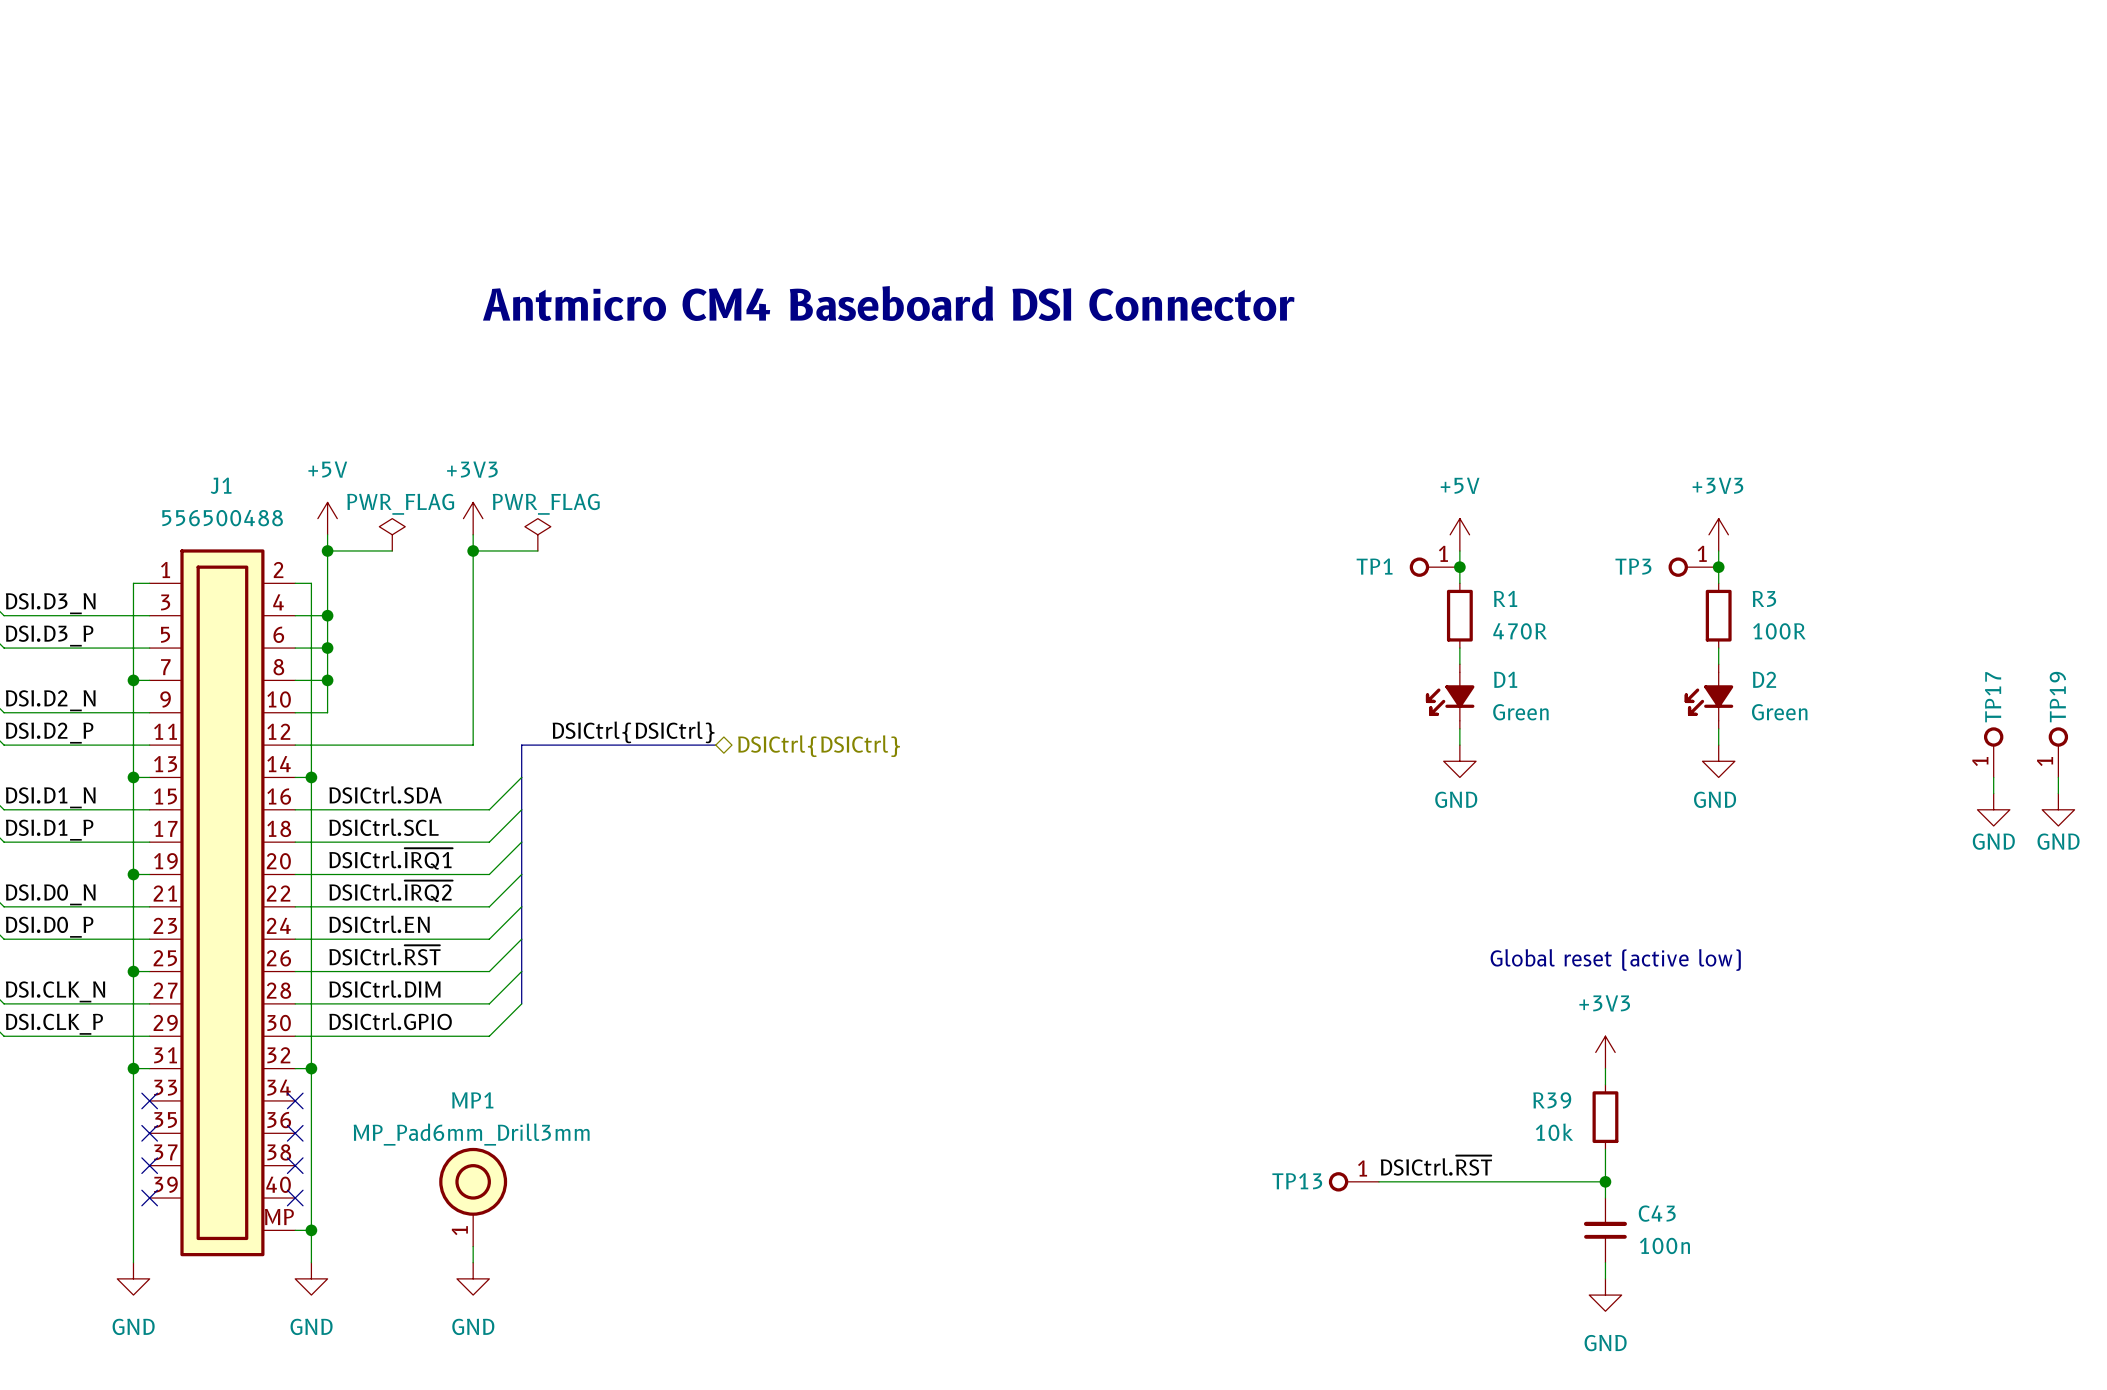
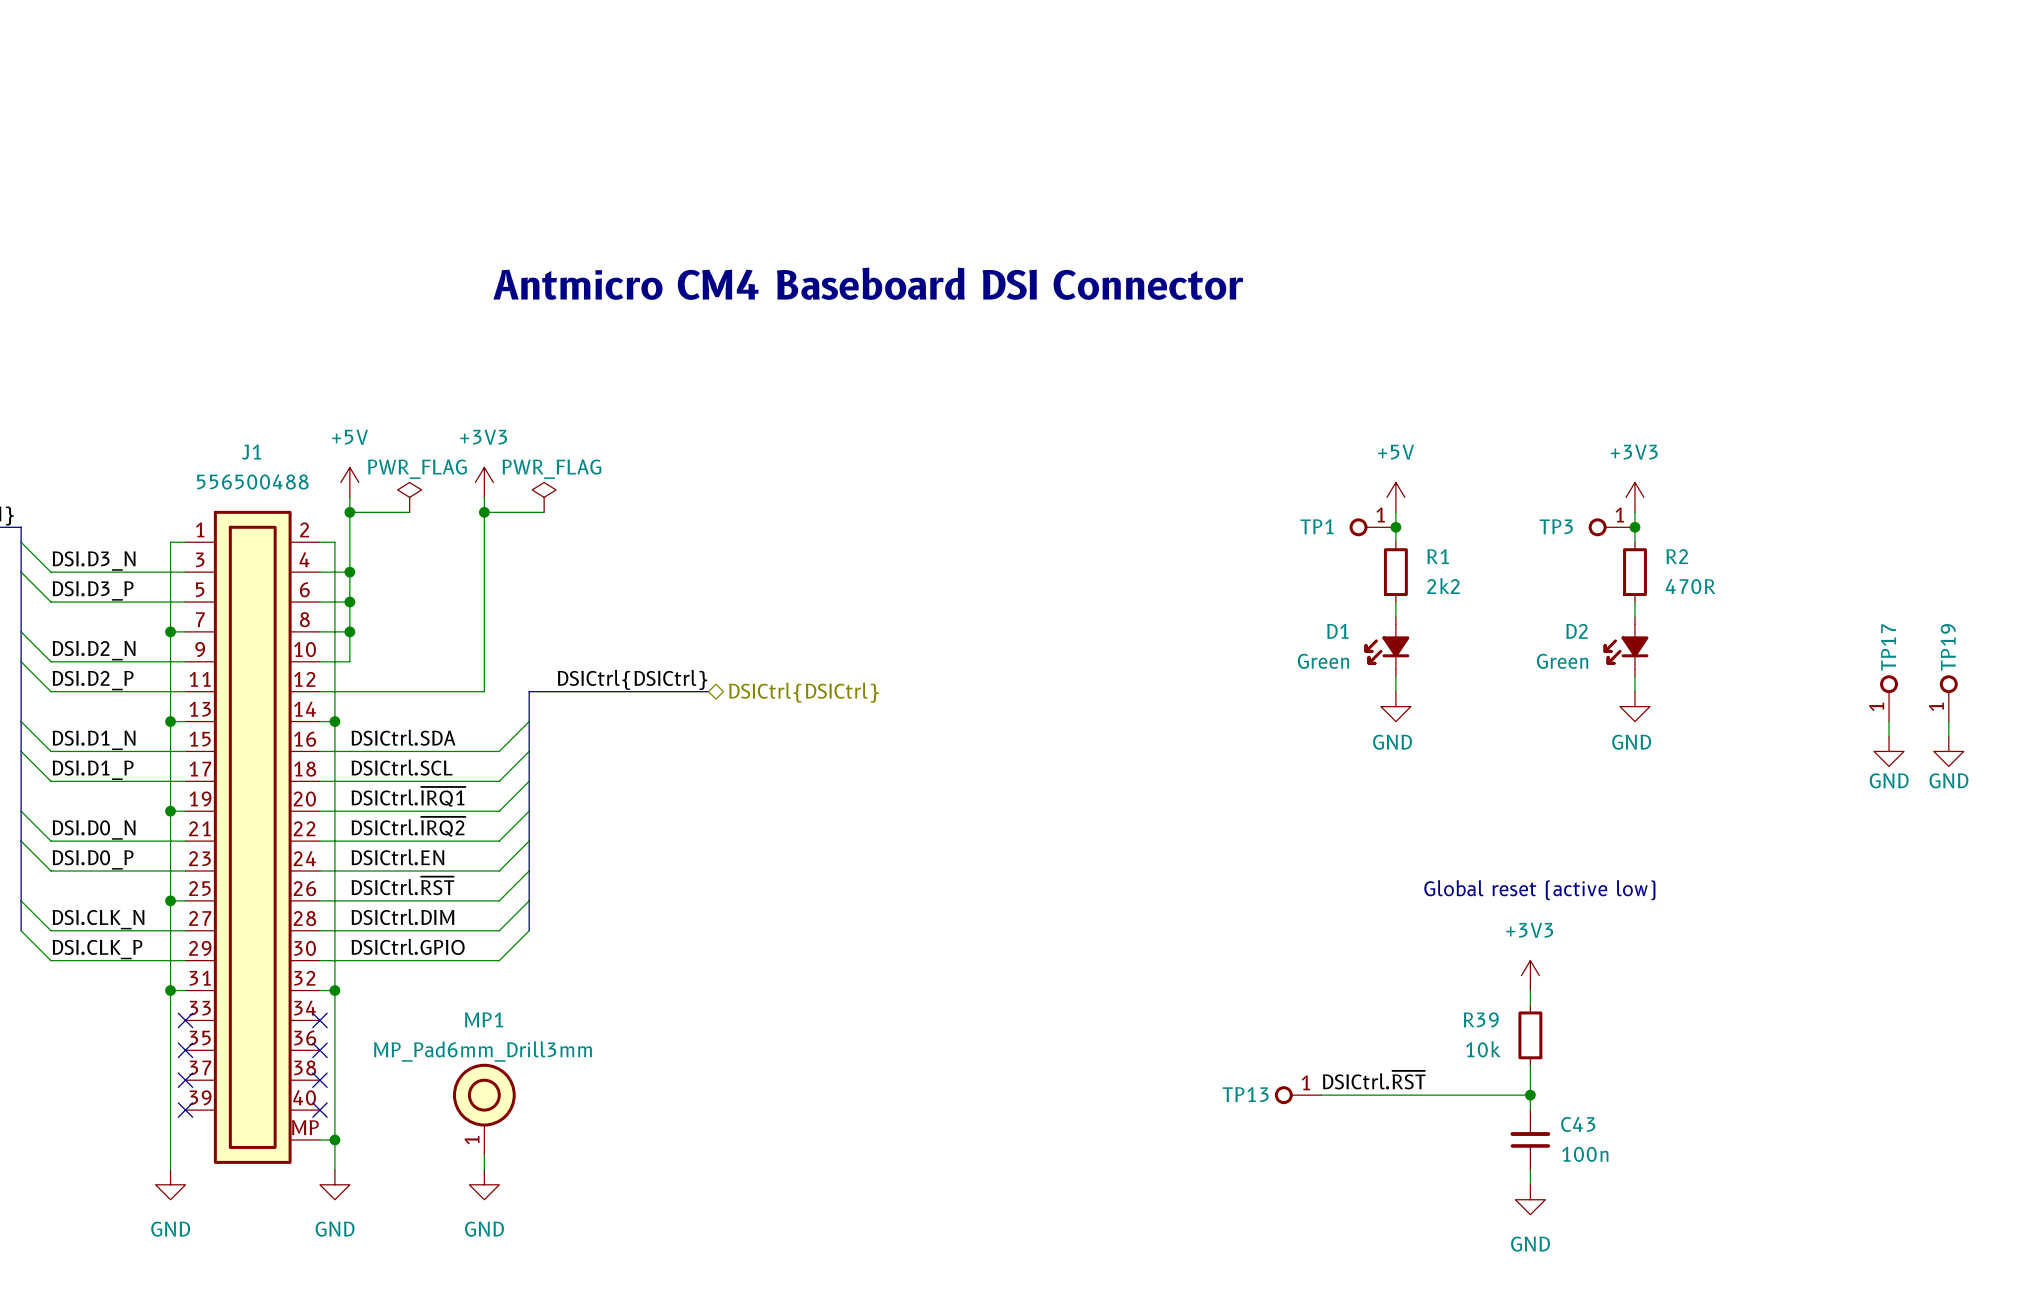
R3 name: R3 (1764, 598) -> R2 (1677, 556)
R1 text: 470R (1520, 631) -> 2k2 (1443, 586)
R3 text: 100R (1779, 631) -> 470R (1690, 586)
D1 name position: D1 (1505, 679) -> D1 (1337, 631)
D2 name position: D2 (1764, 679) -> D2 (1577, 631)
D1 text position: Green (1520, 712) -> Green (1323, 661)
D2 text position: Green (1779, 712) -> Green (1562, 661)

